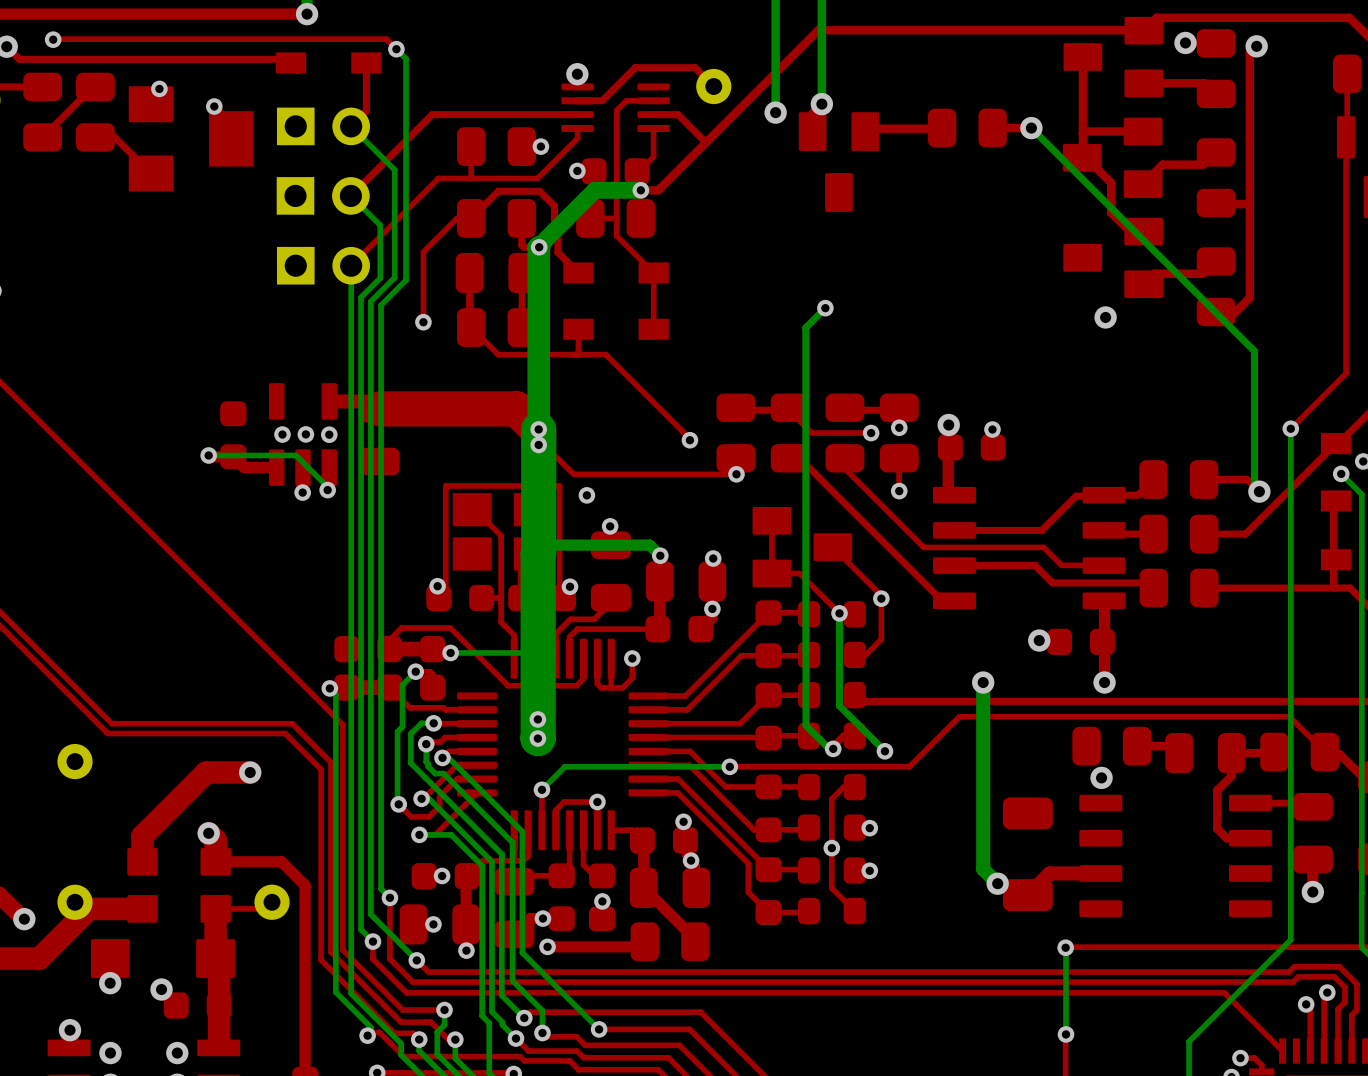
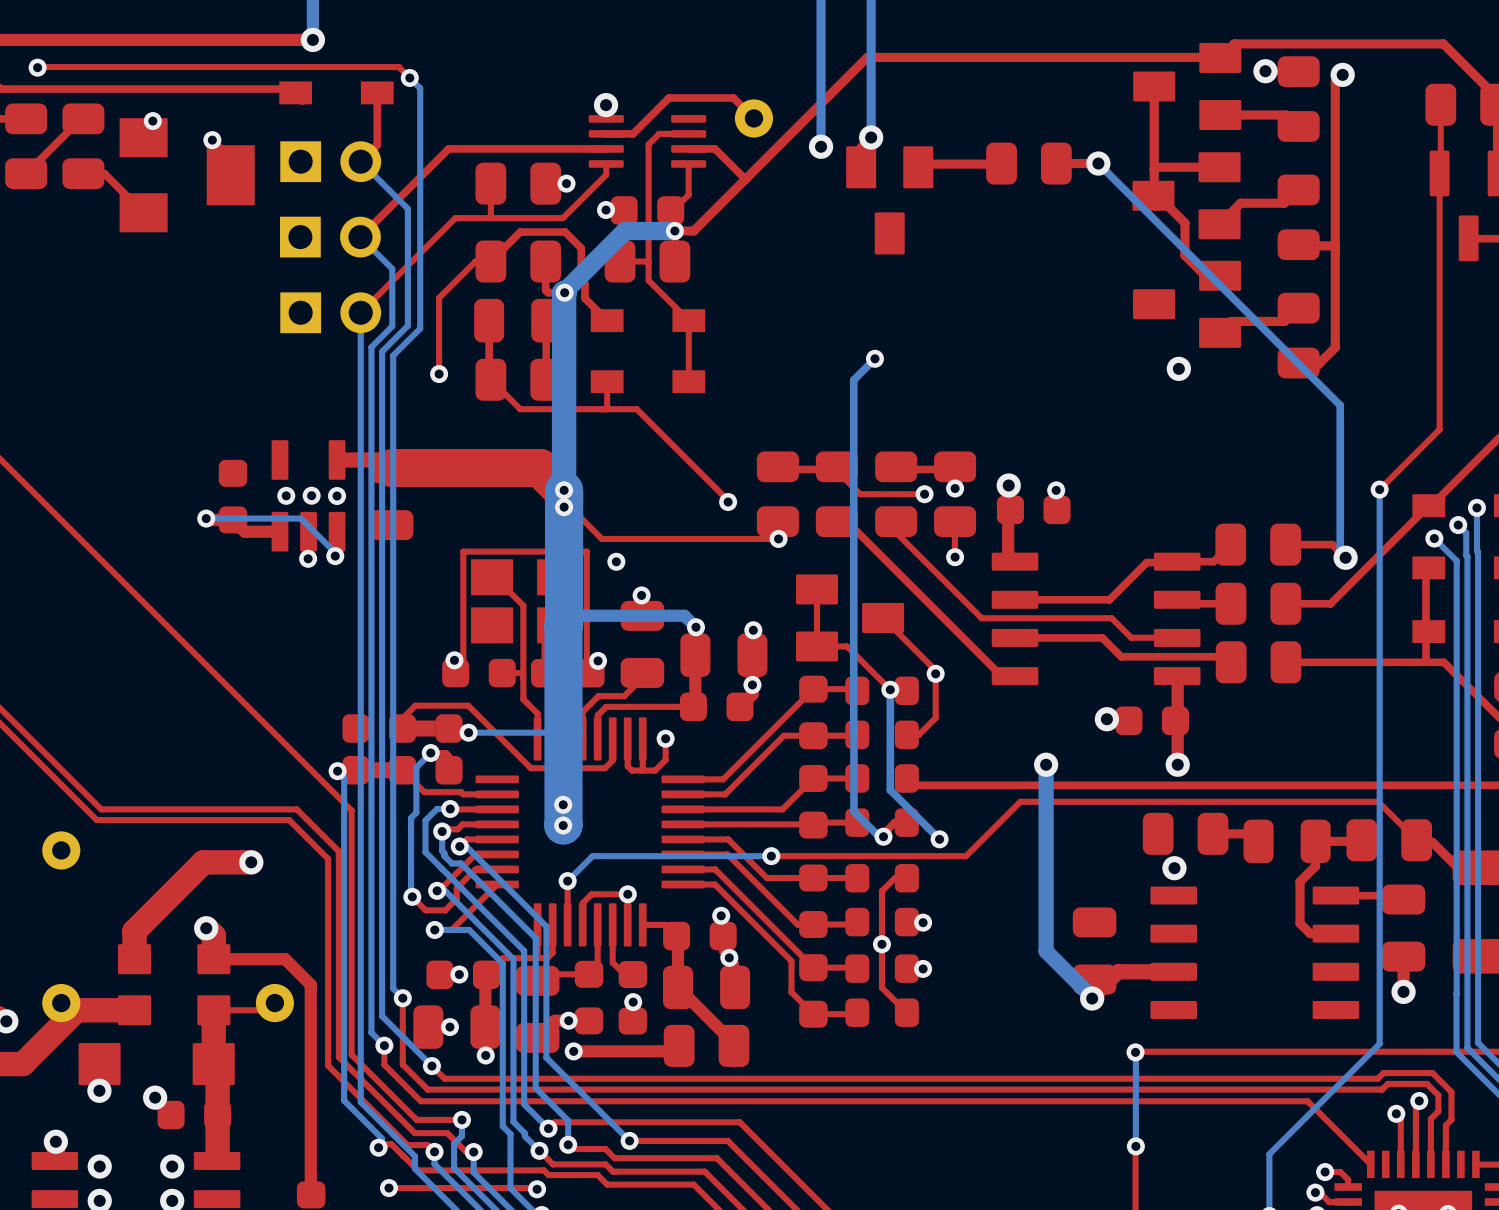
part footprint: [1002, 797, 1053, 912] -> [1072, 907, 1117, 995]
bottom track: (983, 854) (983, 869) (997, 883) -> (1046, 951) (1092, 998)
via position: (997, 883) -> (1092, 998)

